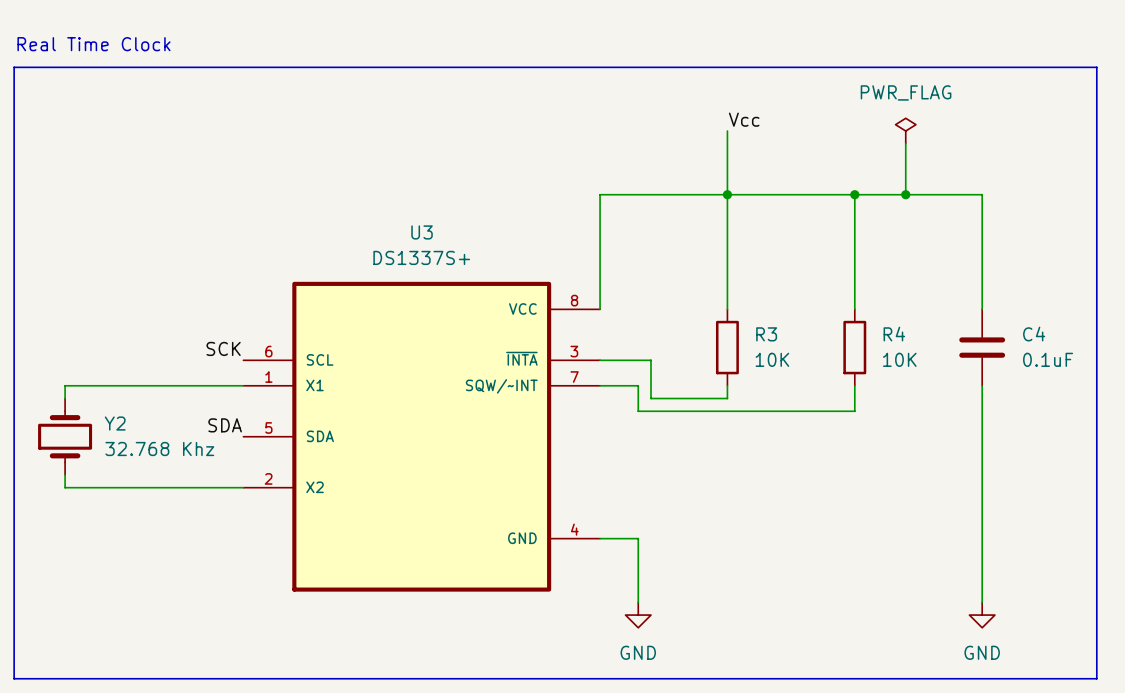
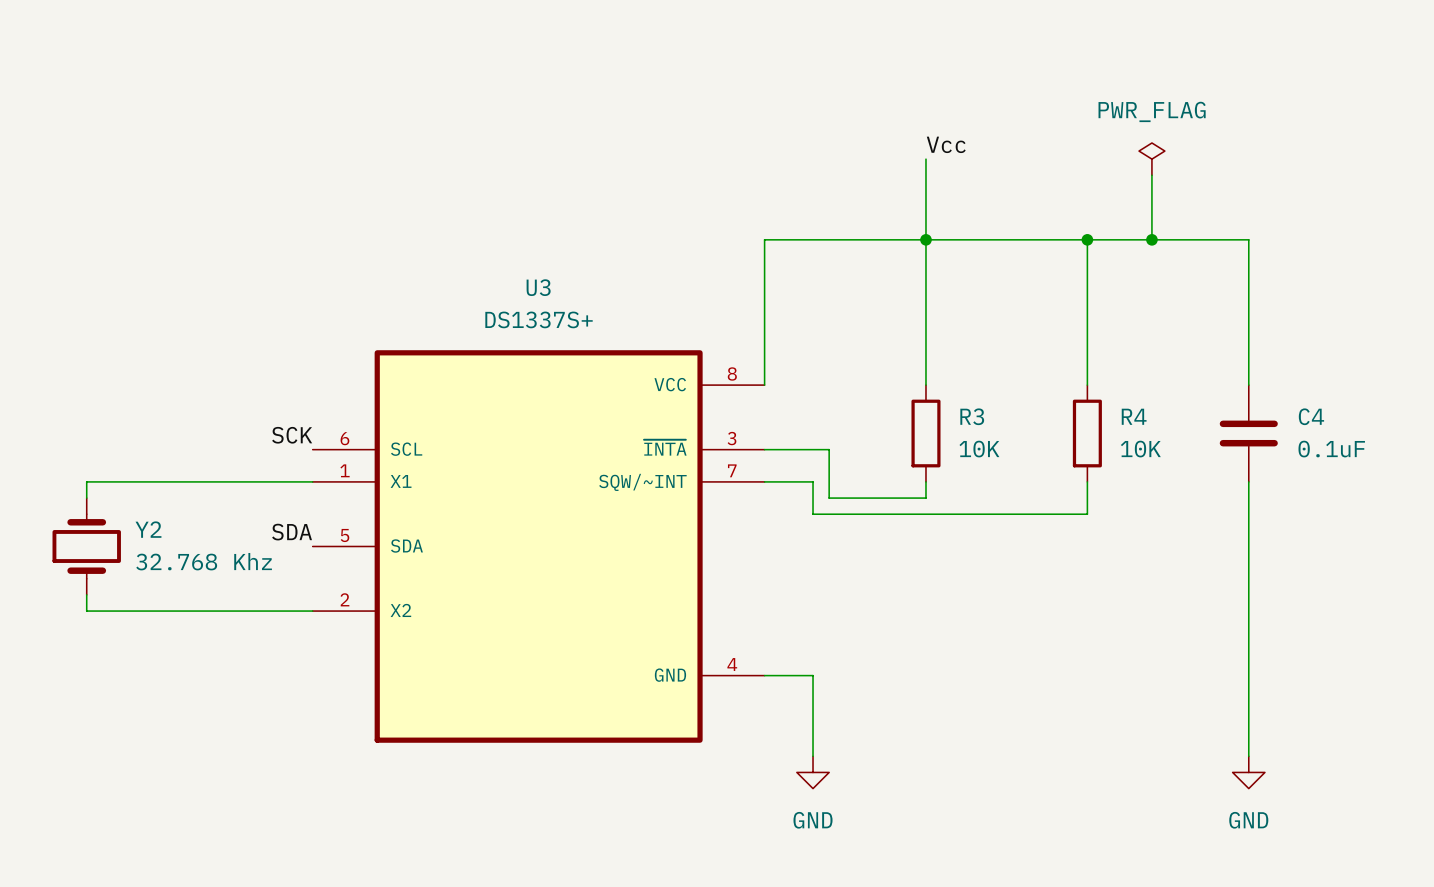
text: Real Time Clock (93, 44) -> none
line: (14, 67) (14, 678) (1096, 678) (1096, 67) (14, 67) -> none

